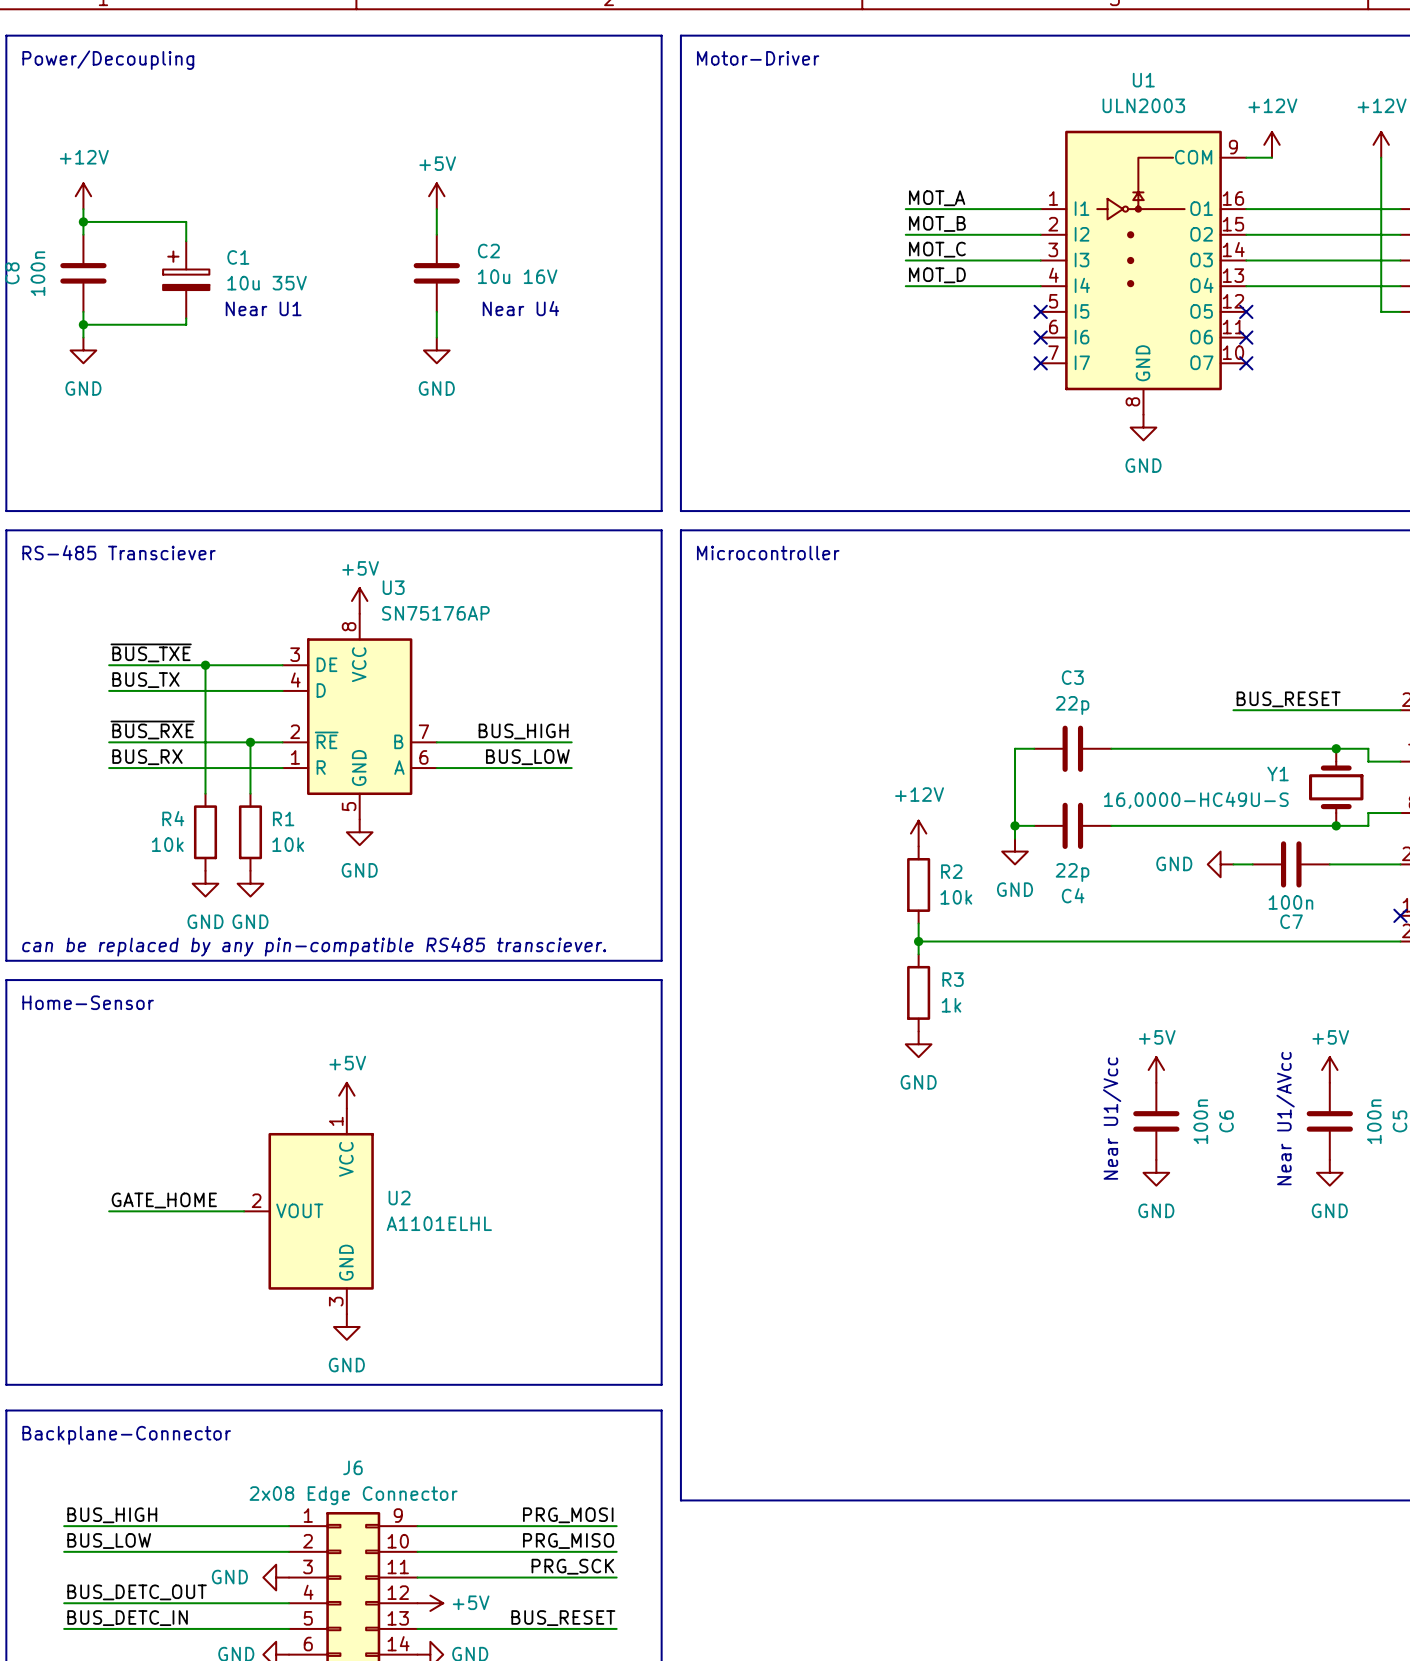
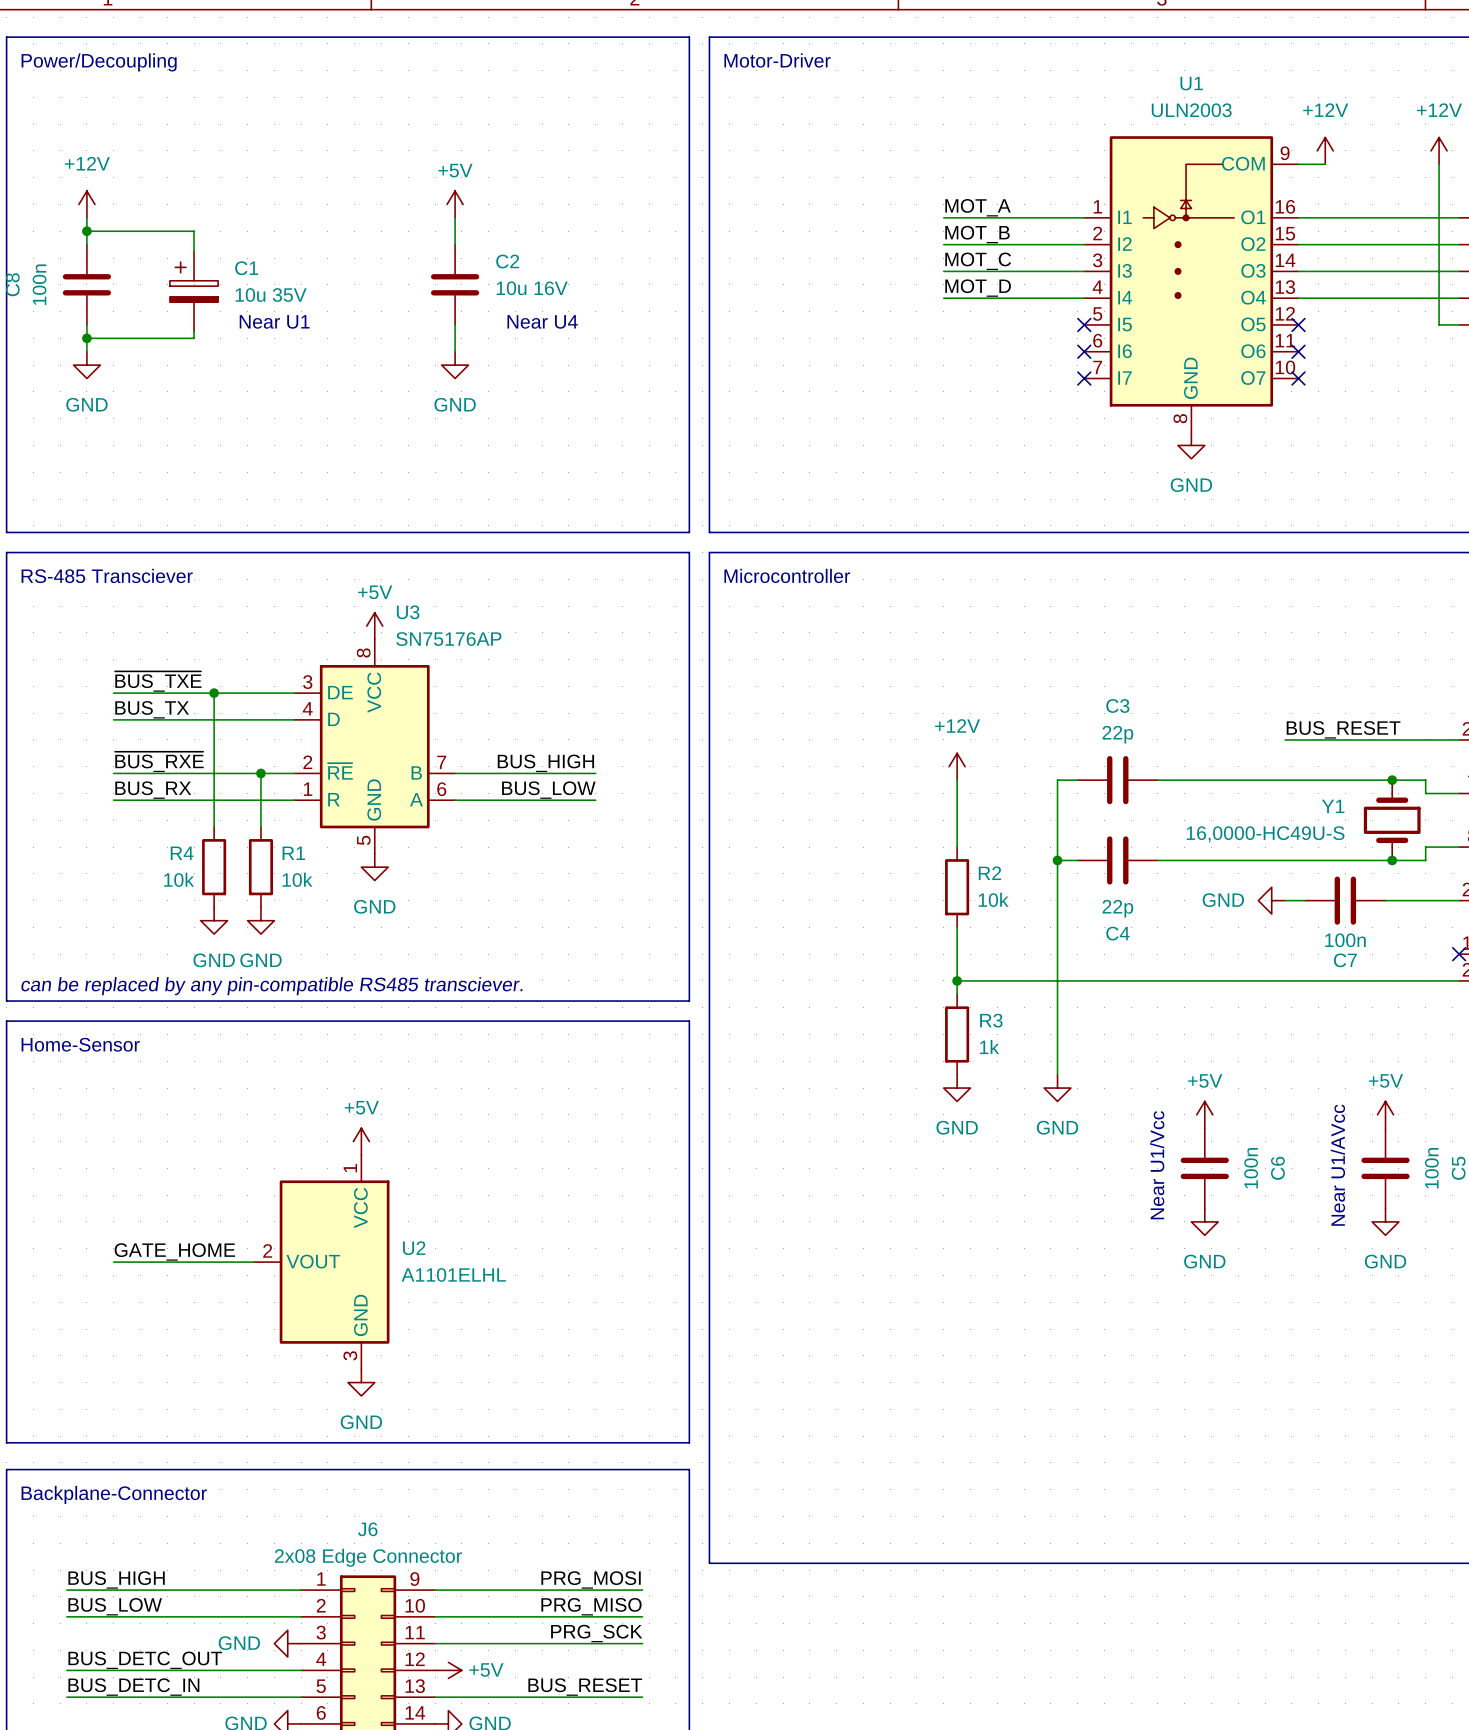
wire: none -> (957, 780) (957, 847)
power symbol position: +12V (918, 833) -> +12V (957, 766)
wire: none -> (1057, 873) (1057, 1074)
power symbol position: GND (1015, 851) -> GND (1057, 1088)
R2 position: (918, 884) -> (957, 887)
wire: none -> (957, 927) (957, 962)

